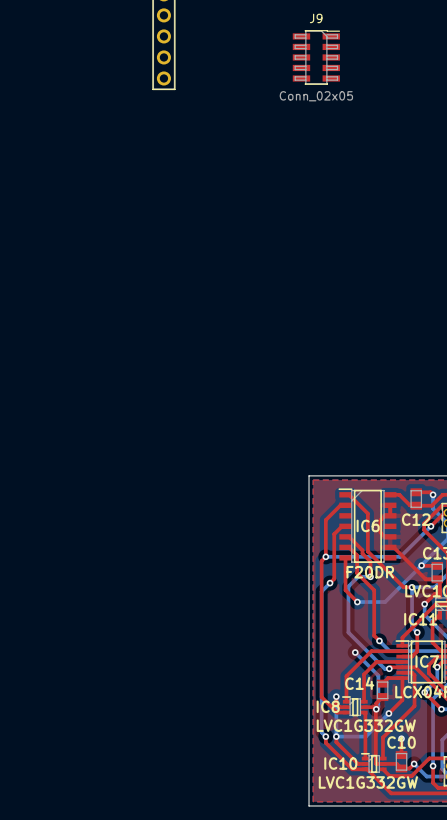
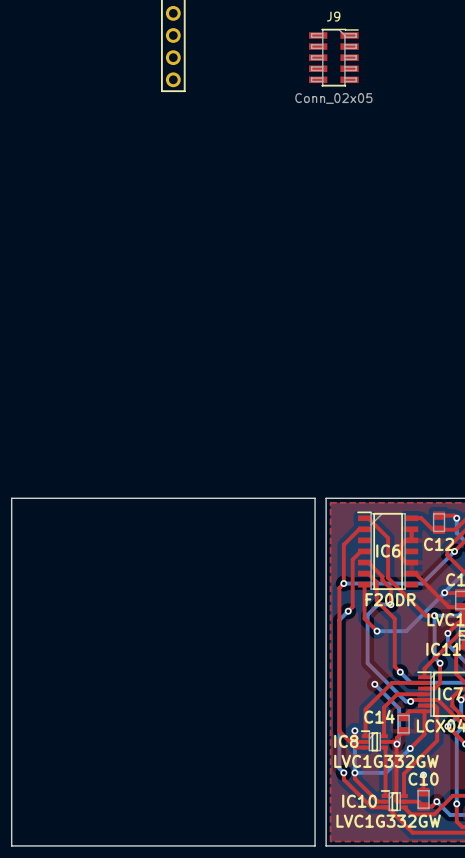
board edge: none -> (11, 498) (315, 498) (315, 845) (11, 845) (11, 498)

